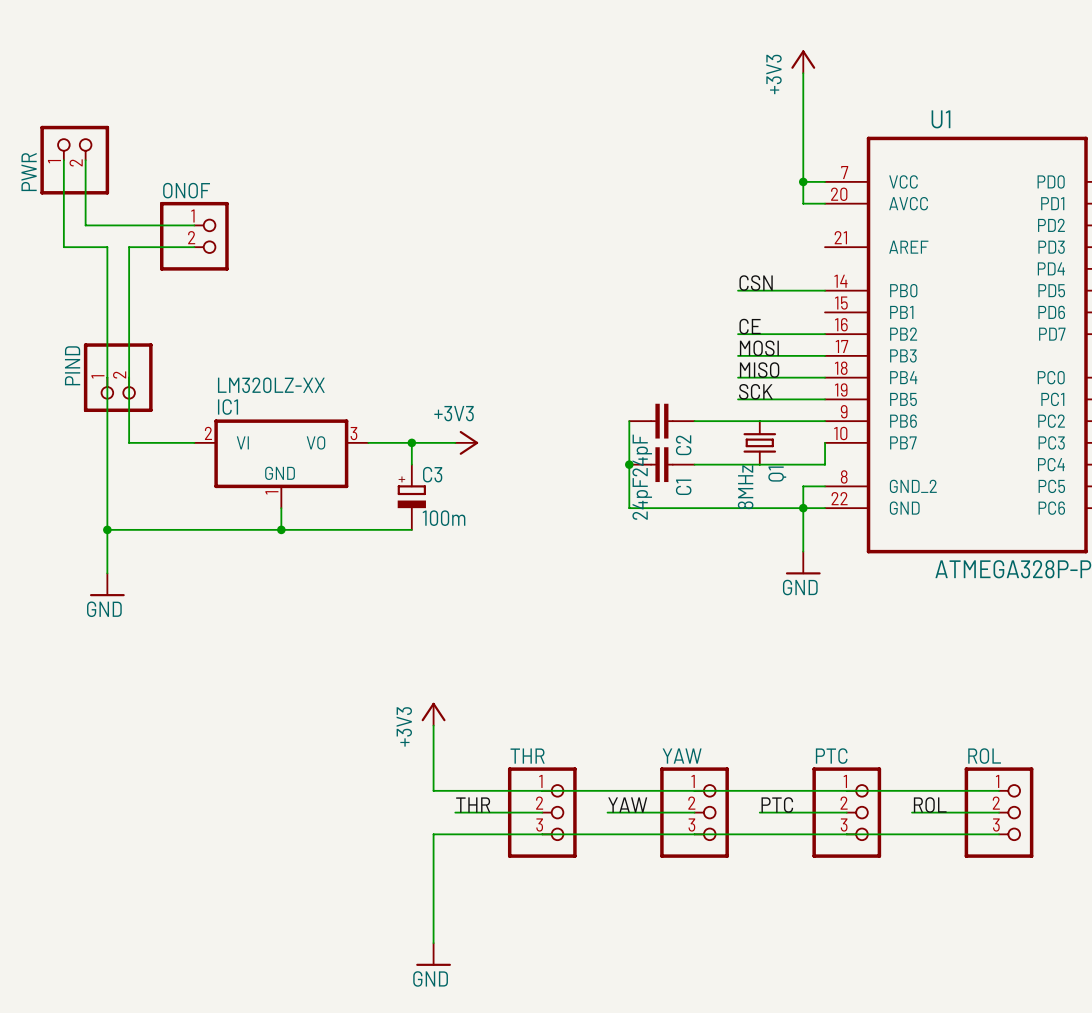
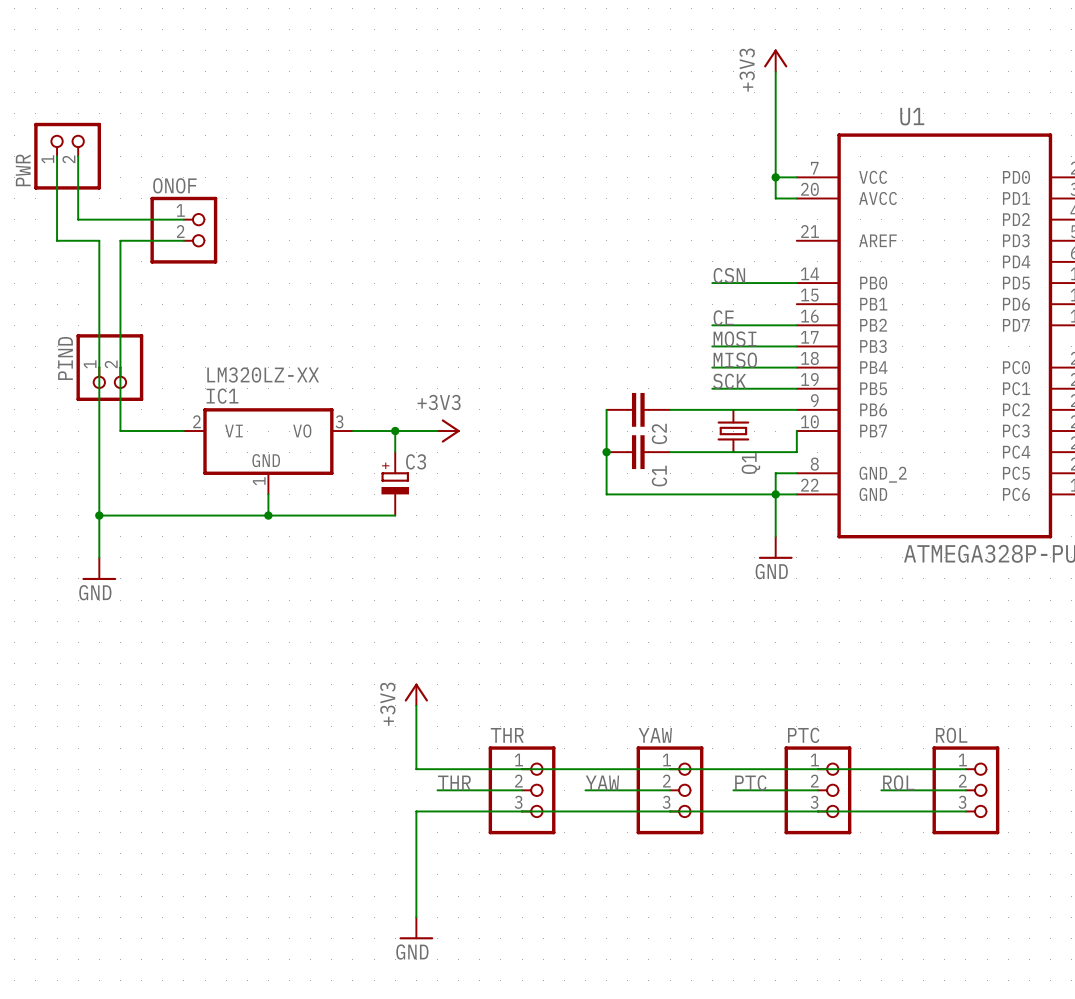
C2 value: 24pF (642, 455) -> none
Q1 value: 8MHz (745, 487) -> none
C1 value: 24pF (642, 498) -> none
C3 value: 100m (444, 518) -> none

